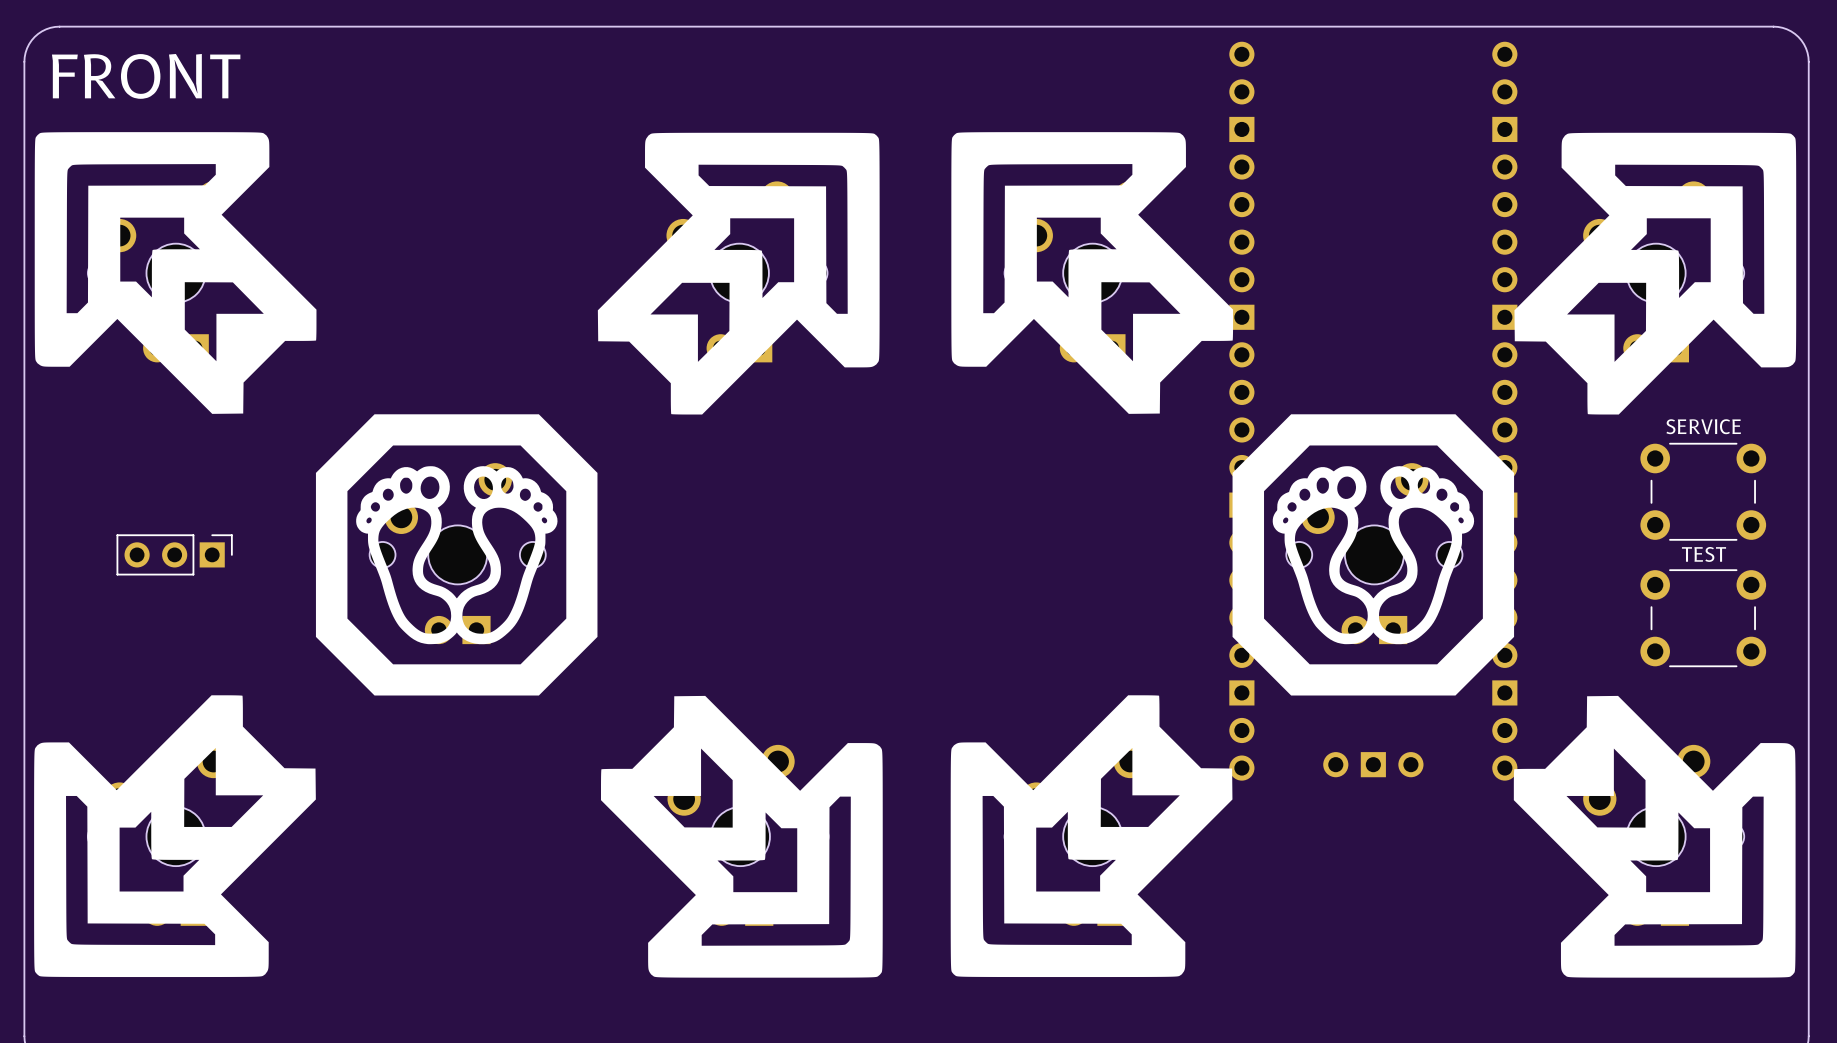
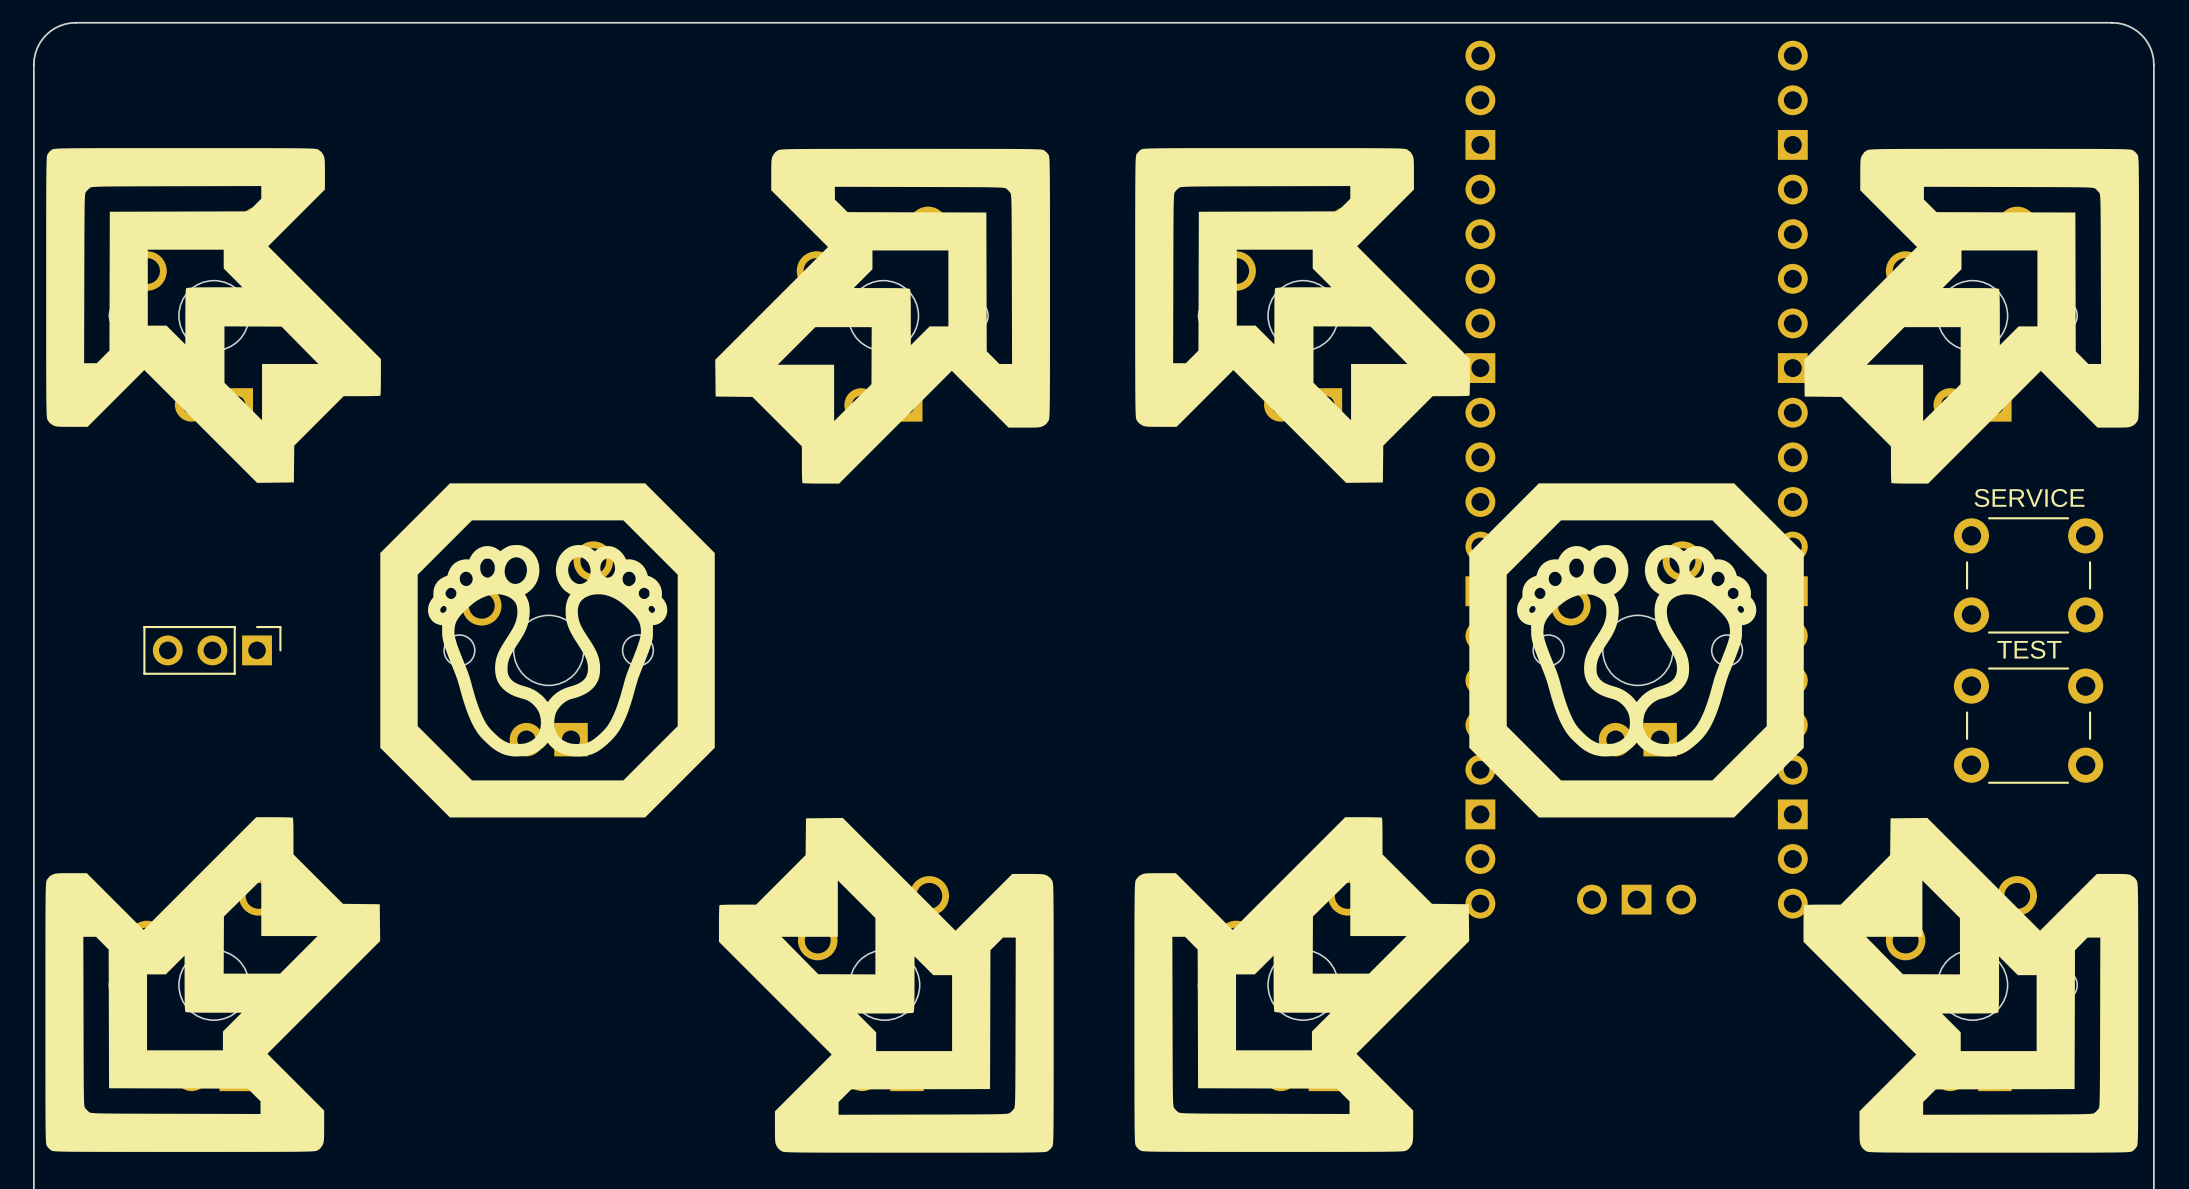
text: FRONT (146, 76) -> none

